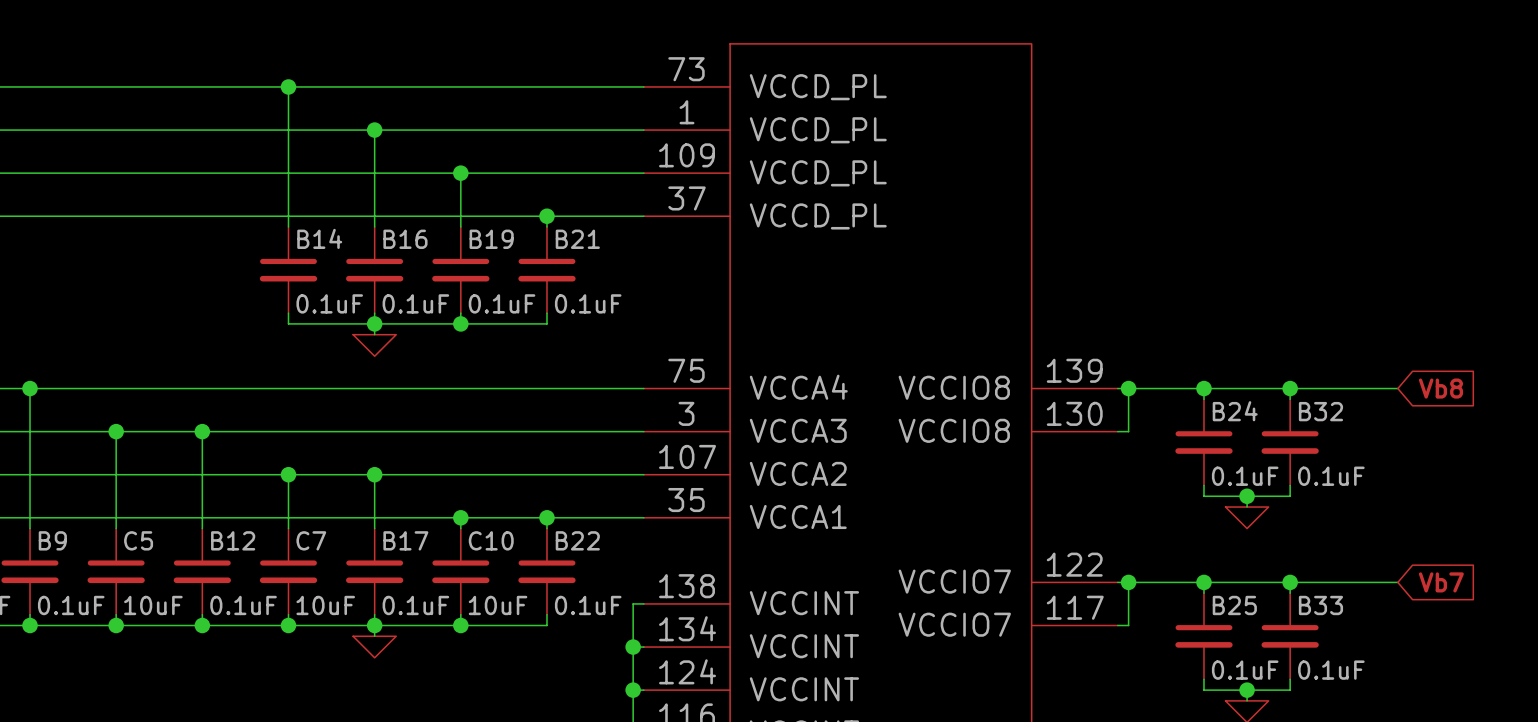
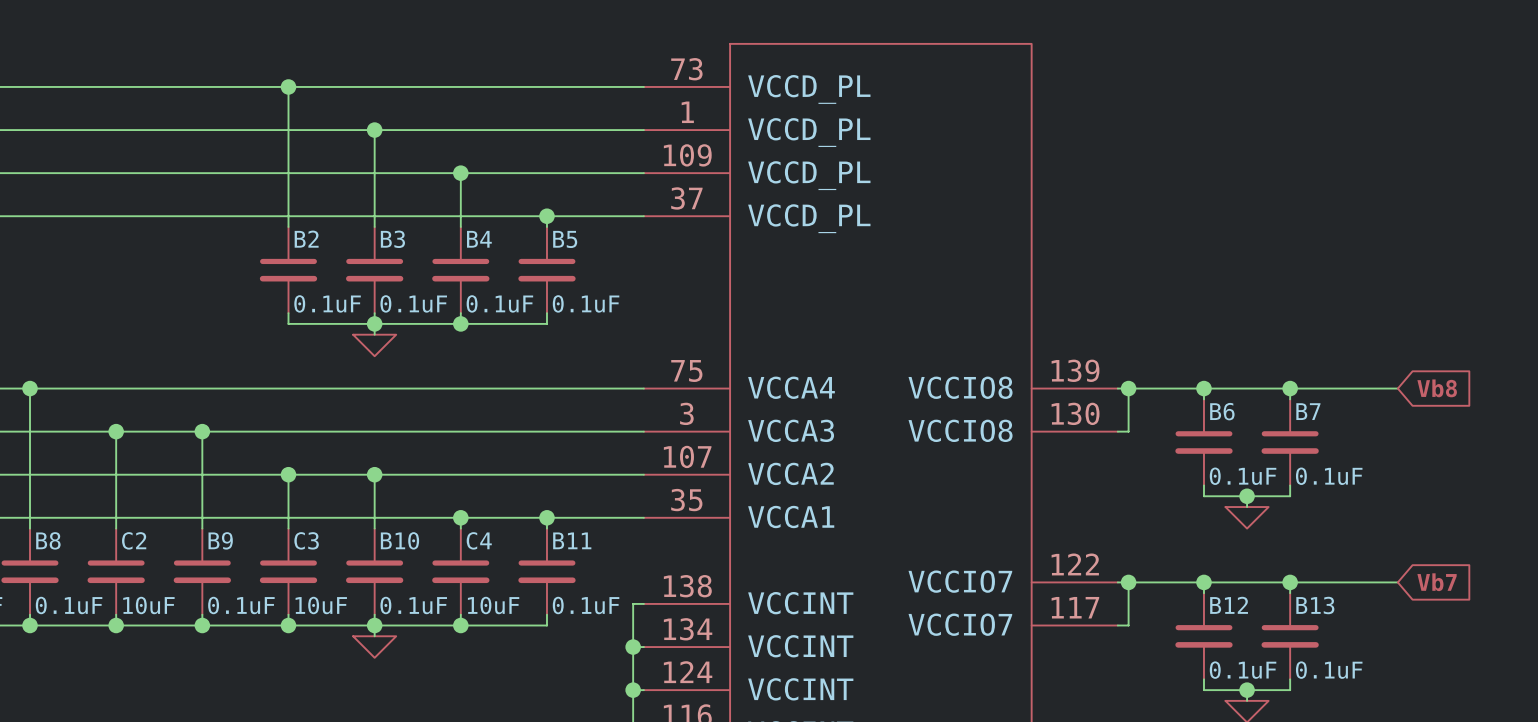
B14 name: B14 (319, 238) -> B2 (306, 239)
B16 name: B16 (405, 239) -> B3 (392, 239)
B19 name: B19 (491, 239) -> B4 (479, 239)
B21 name: B21 (577, 239) -> B5 (565, 239)
B24 name: B24 (1235, 411) -> B6 (1222, 411)
B32 name: B32 (1320, 411) -> B7 (1308, 411)
B9 name: B9 (52, 540) -> B8 (48, 540)
C5 name: C5 (138, 540) -> C2 (134, 540)
B12 name: B12 (233, 540) -> B9 (220, 540)
C7 name: C7 (311, 540) -> C3 (306, 540)
B17 name: B17 (405, 540) -> B10 (399, 540)
C10 name: C10 (491, 540) -> C4 (479, 540)
B22 name: B22 (577, 540) -> B11 (572, 540)
B25 name: B25 (1234, 605) -> B12 (1229, 605)
B33 name: B33 (1320, 605) -> B13 (1315, 605)

